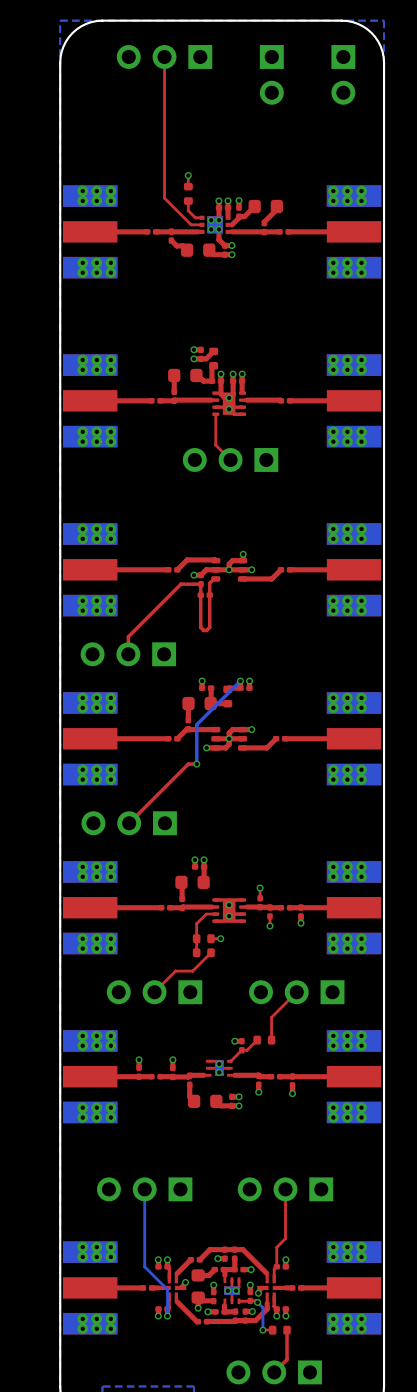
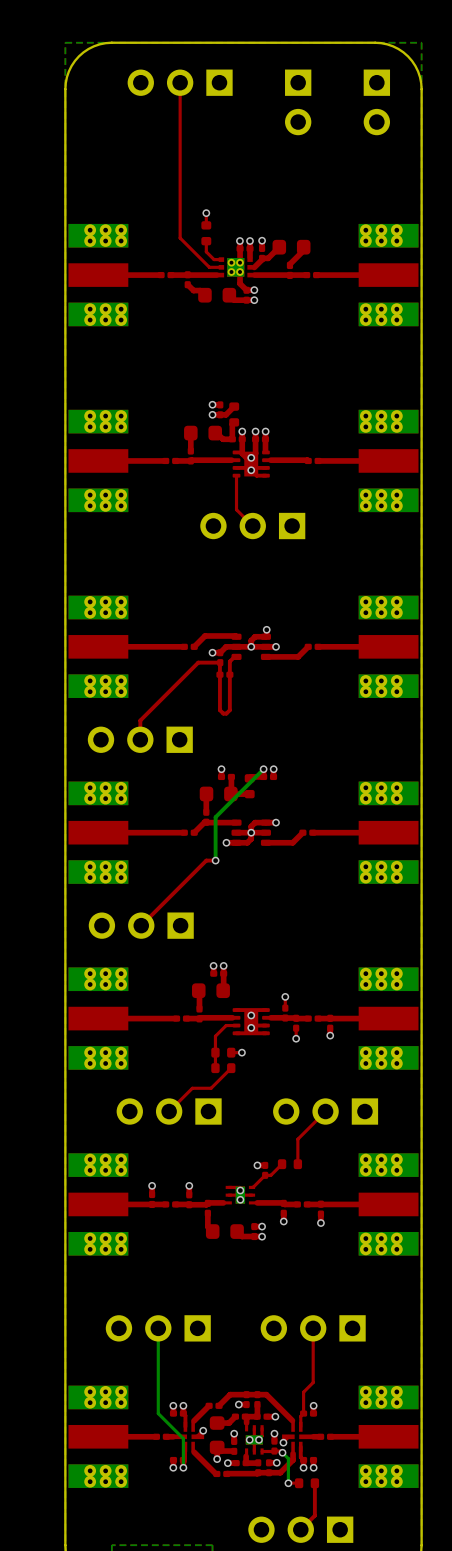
part footprint: [199, 215, 231, 234] -> [218, 257, 253, 278]
via: (211, 220) -> none
via: (218, 220) -> none
via: (211, 229) -> none
via: (218, 229) -> none

